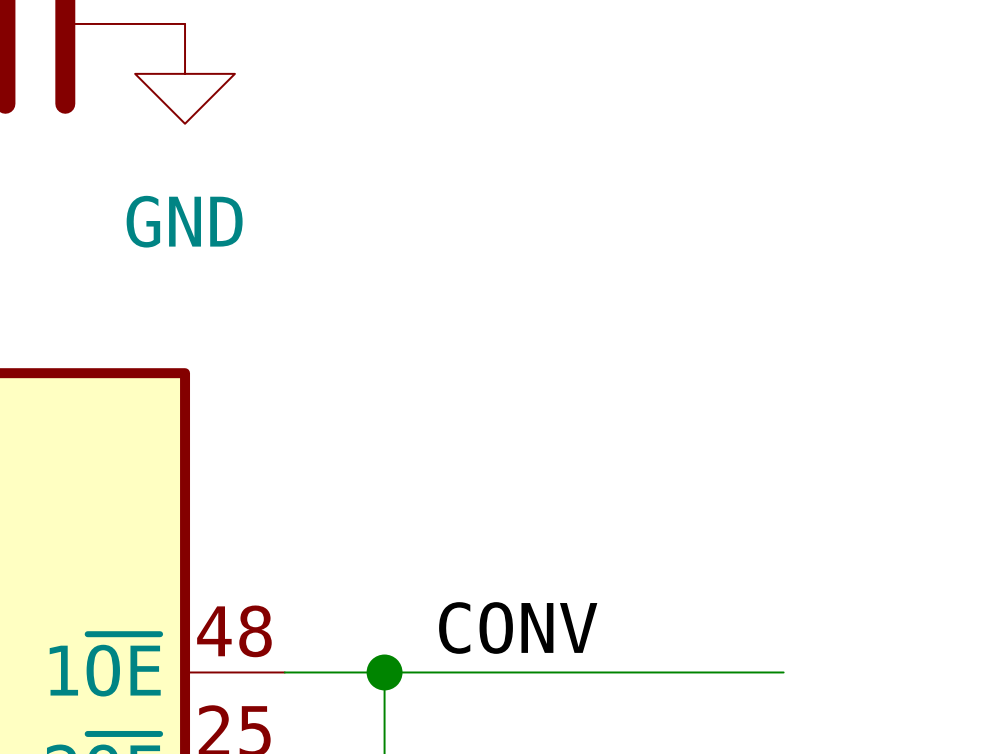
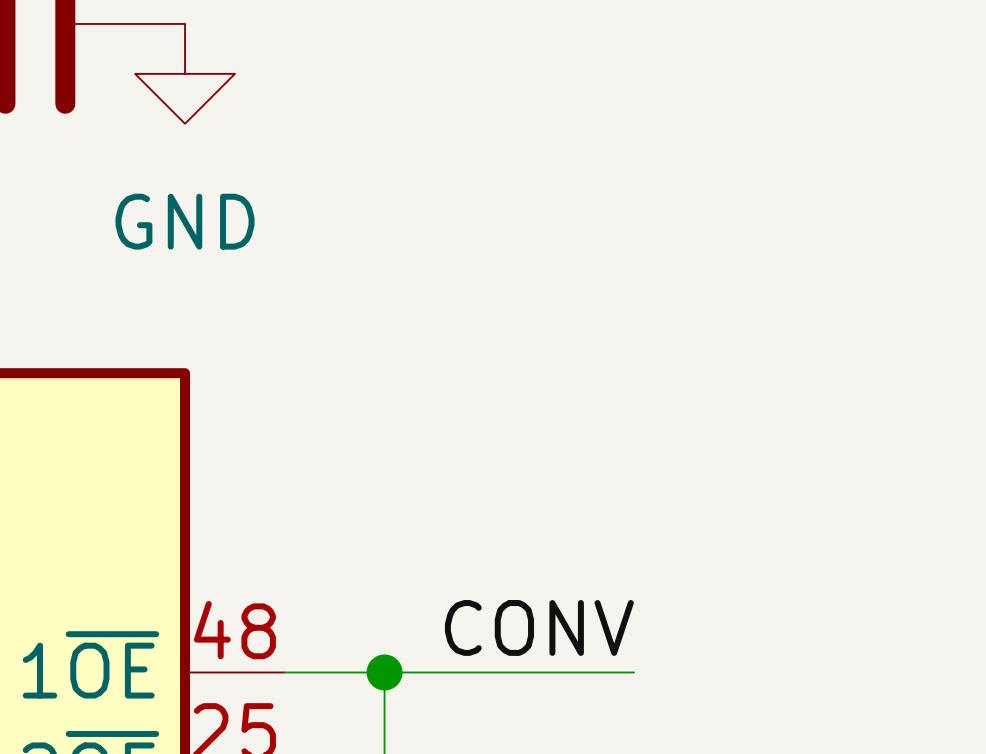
wire: (633, 672) (783, 672) -> none

